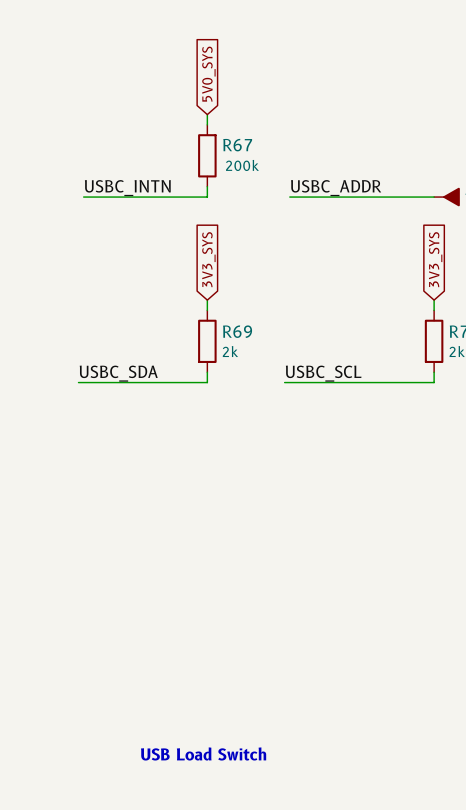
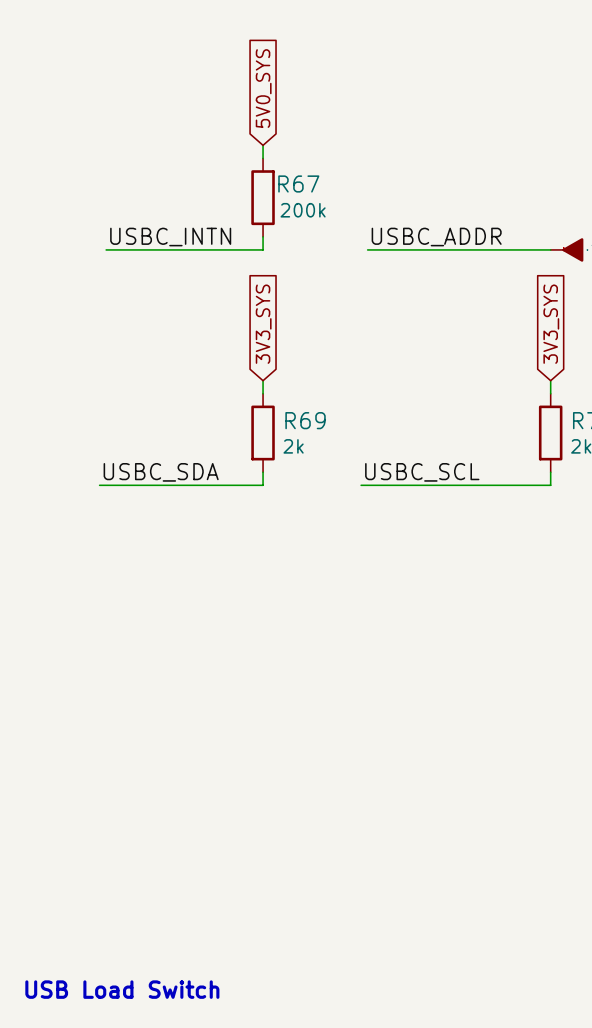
text position: USB Load Switch (203, 753) -> USB Load Switch (122, 989)

